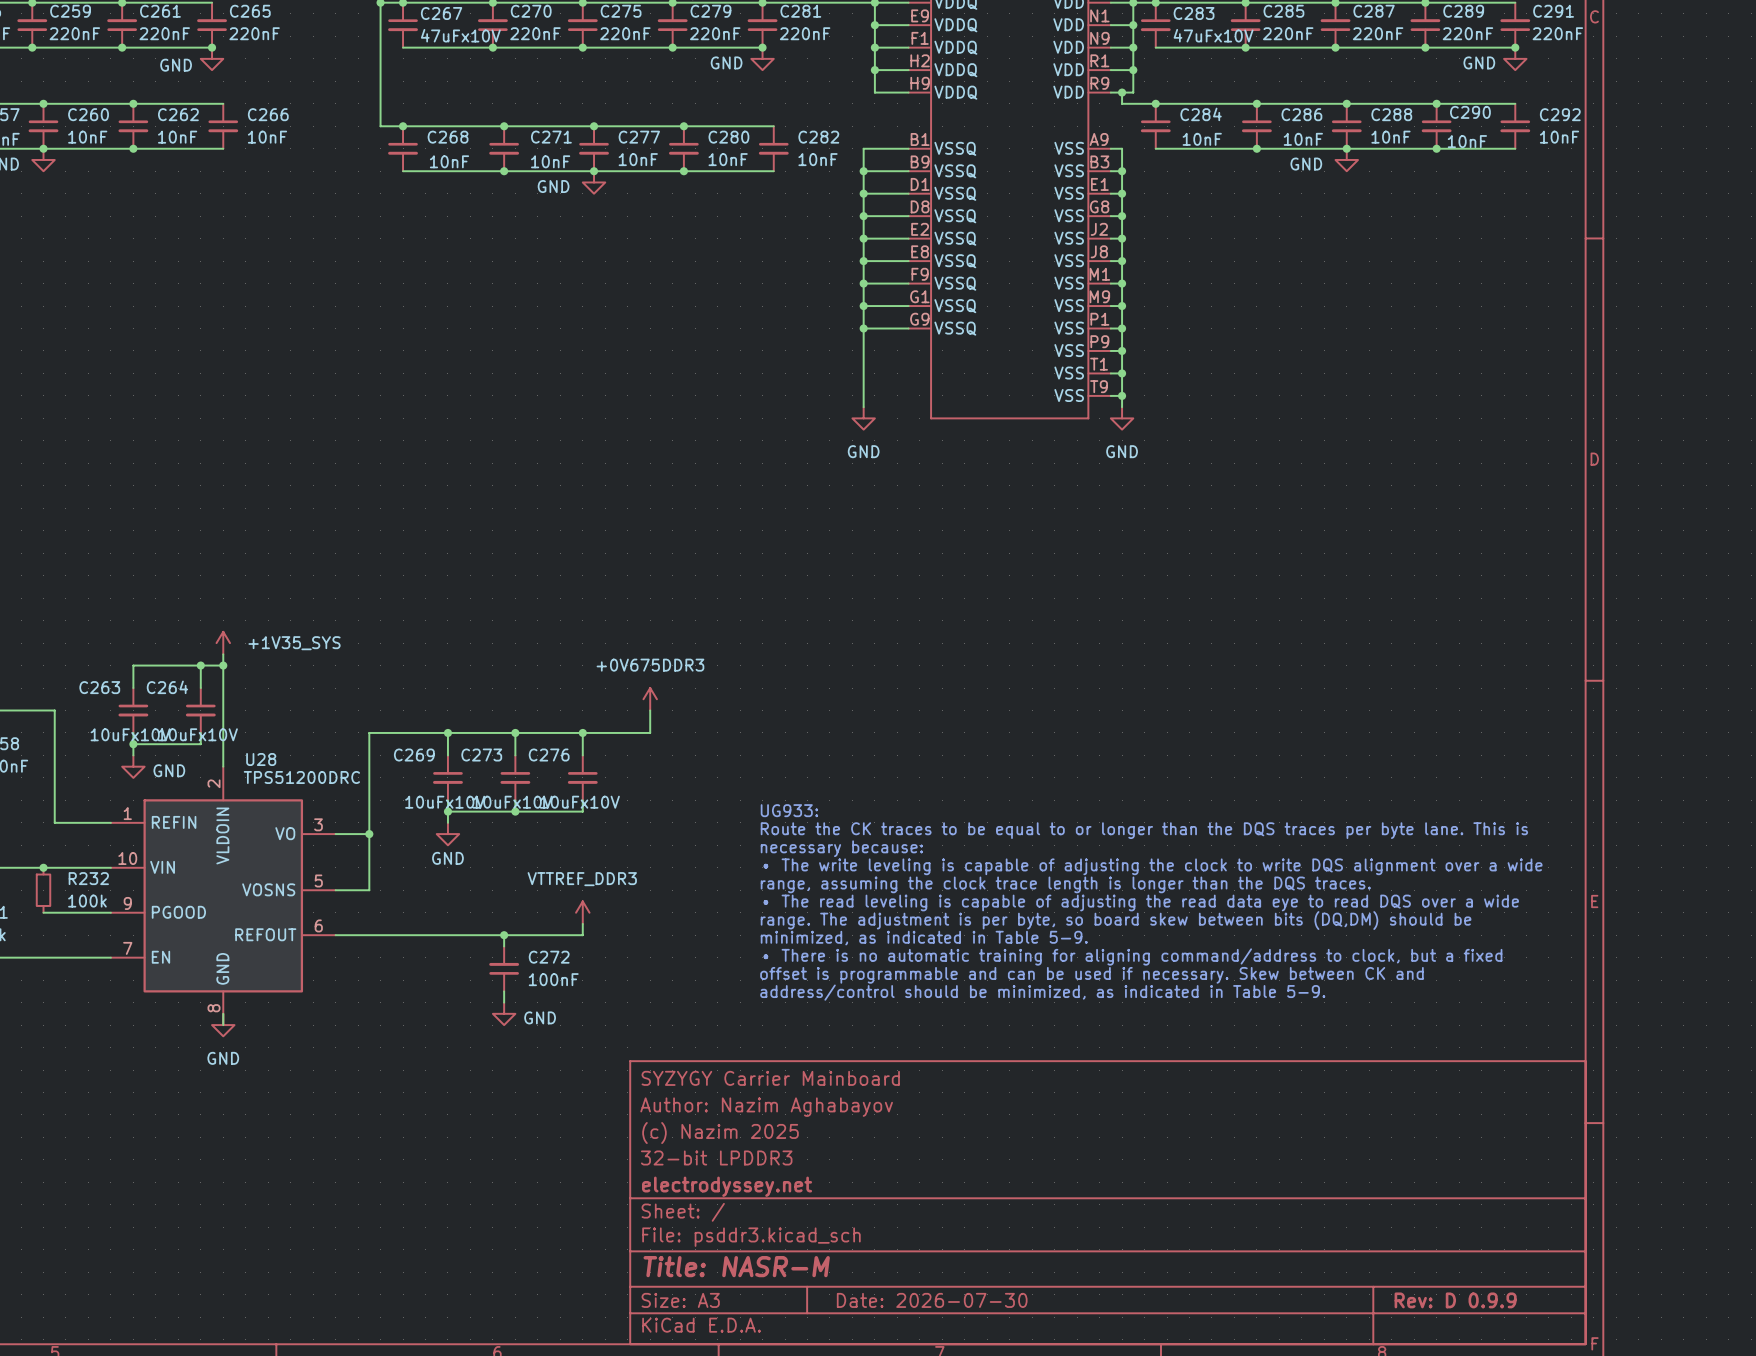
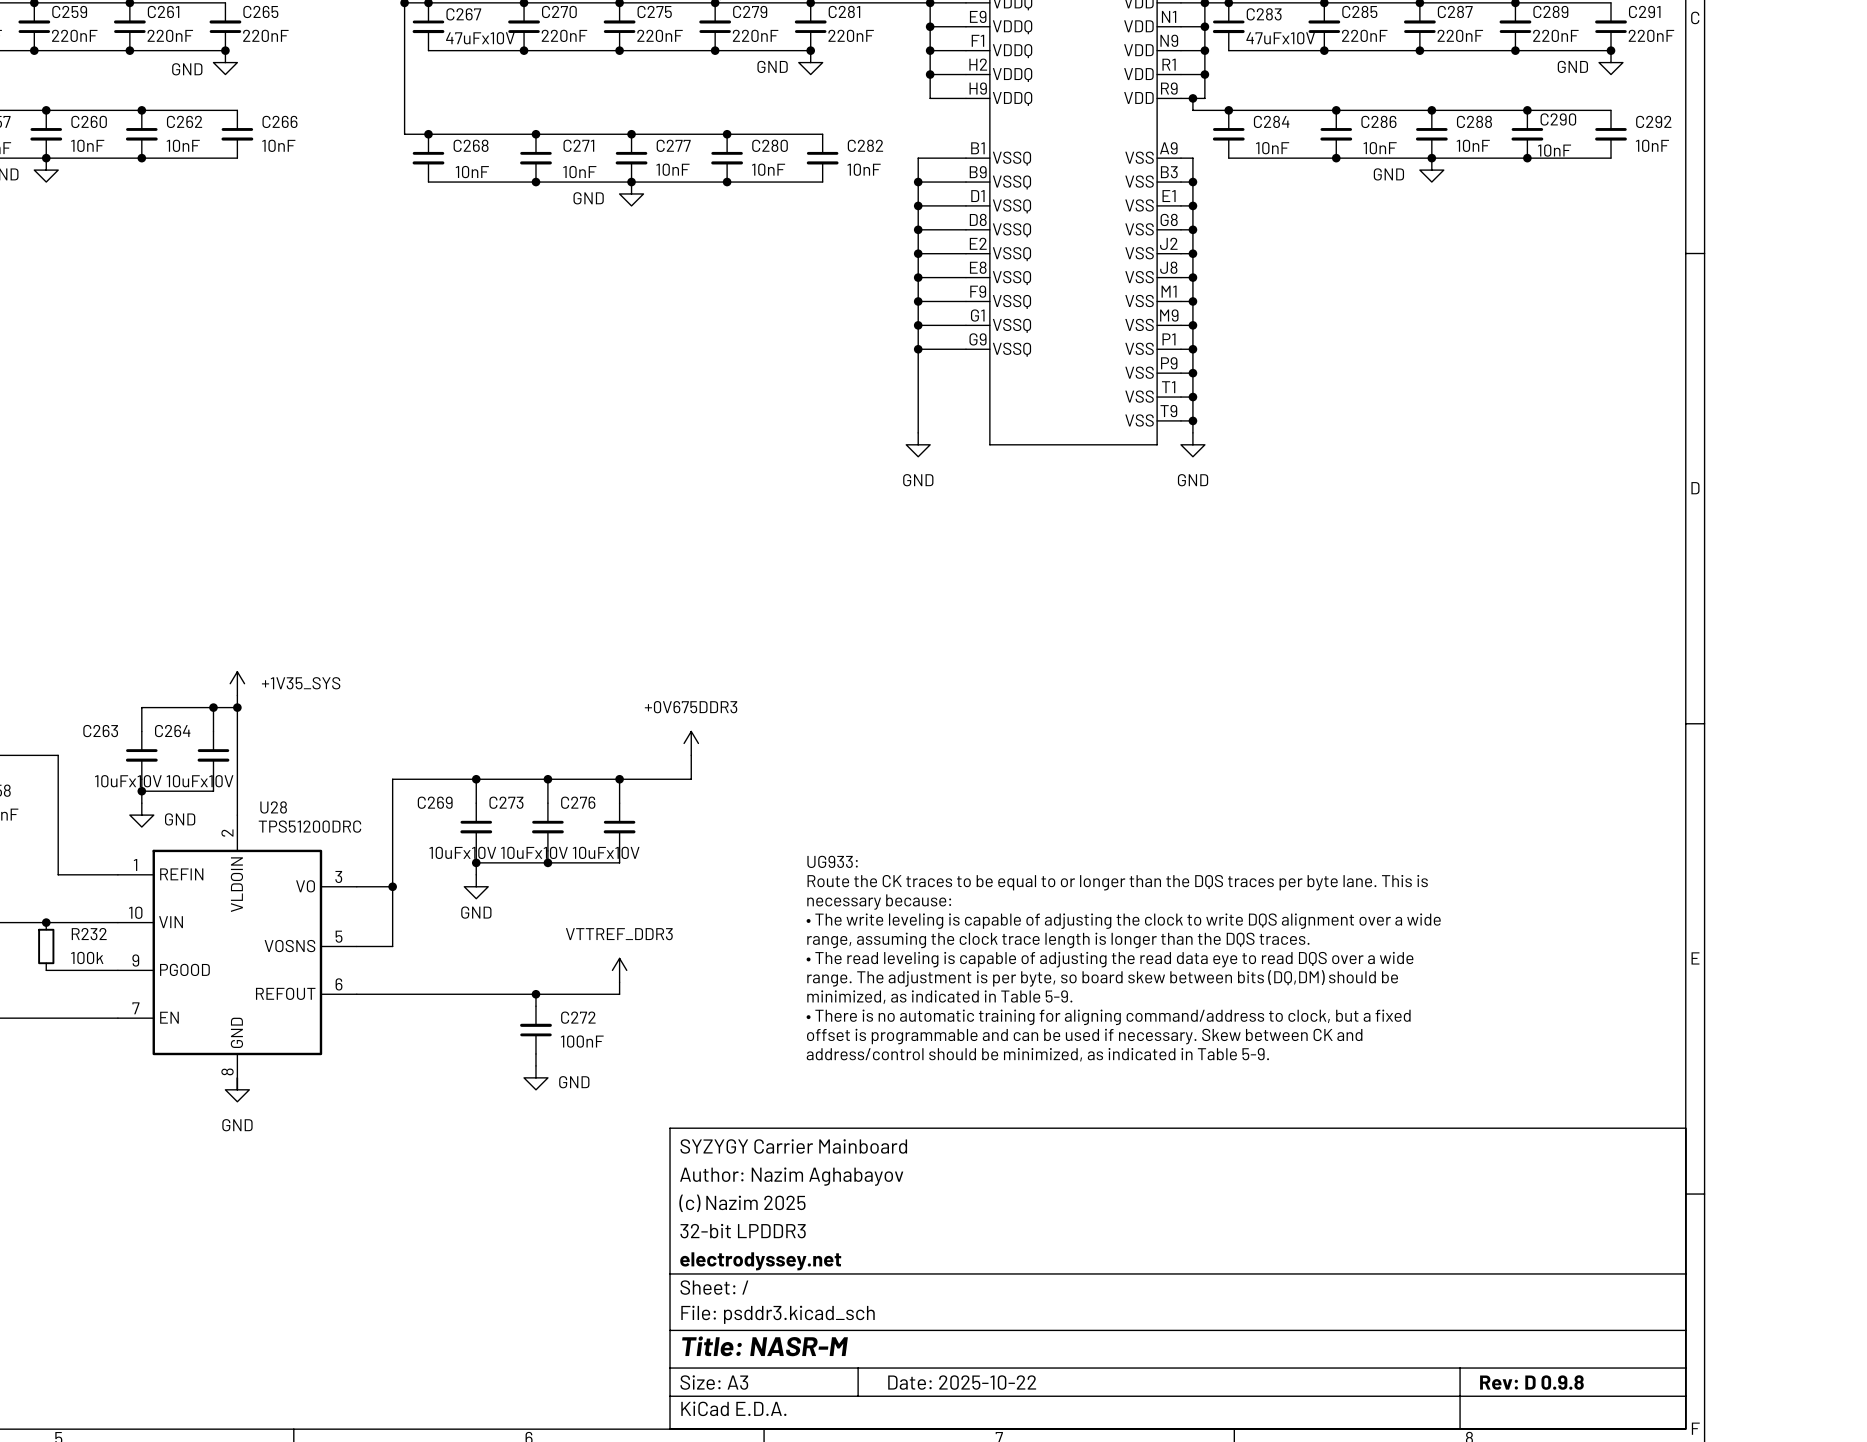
title block: Date: 2026-07-30 (932, 1300) -> Date: 2025-10-22 (962, 1382)
title block: Rev: D 0.9.9 (1455, 1300) -> Rev: D 0.9.8 (1531, 1382)

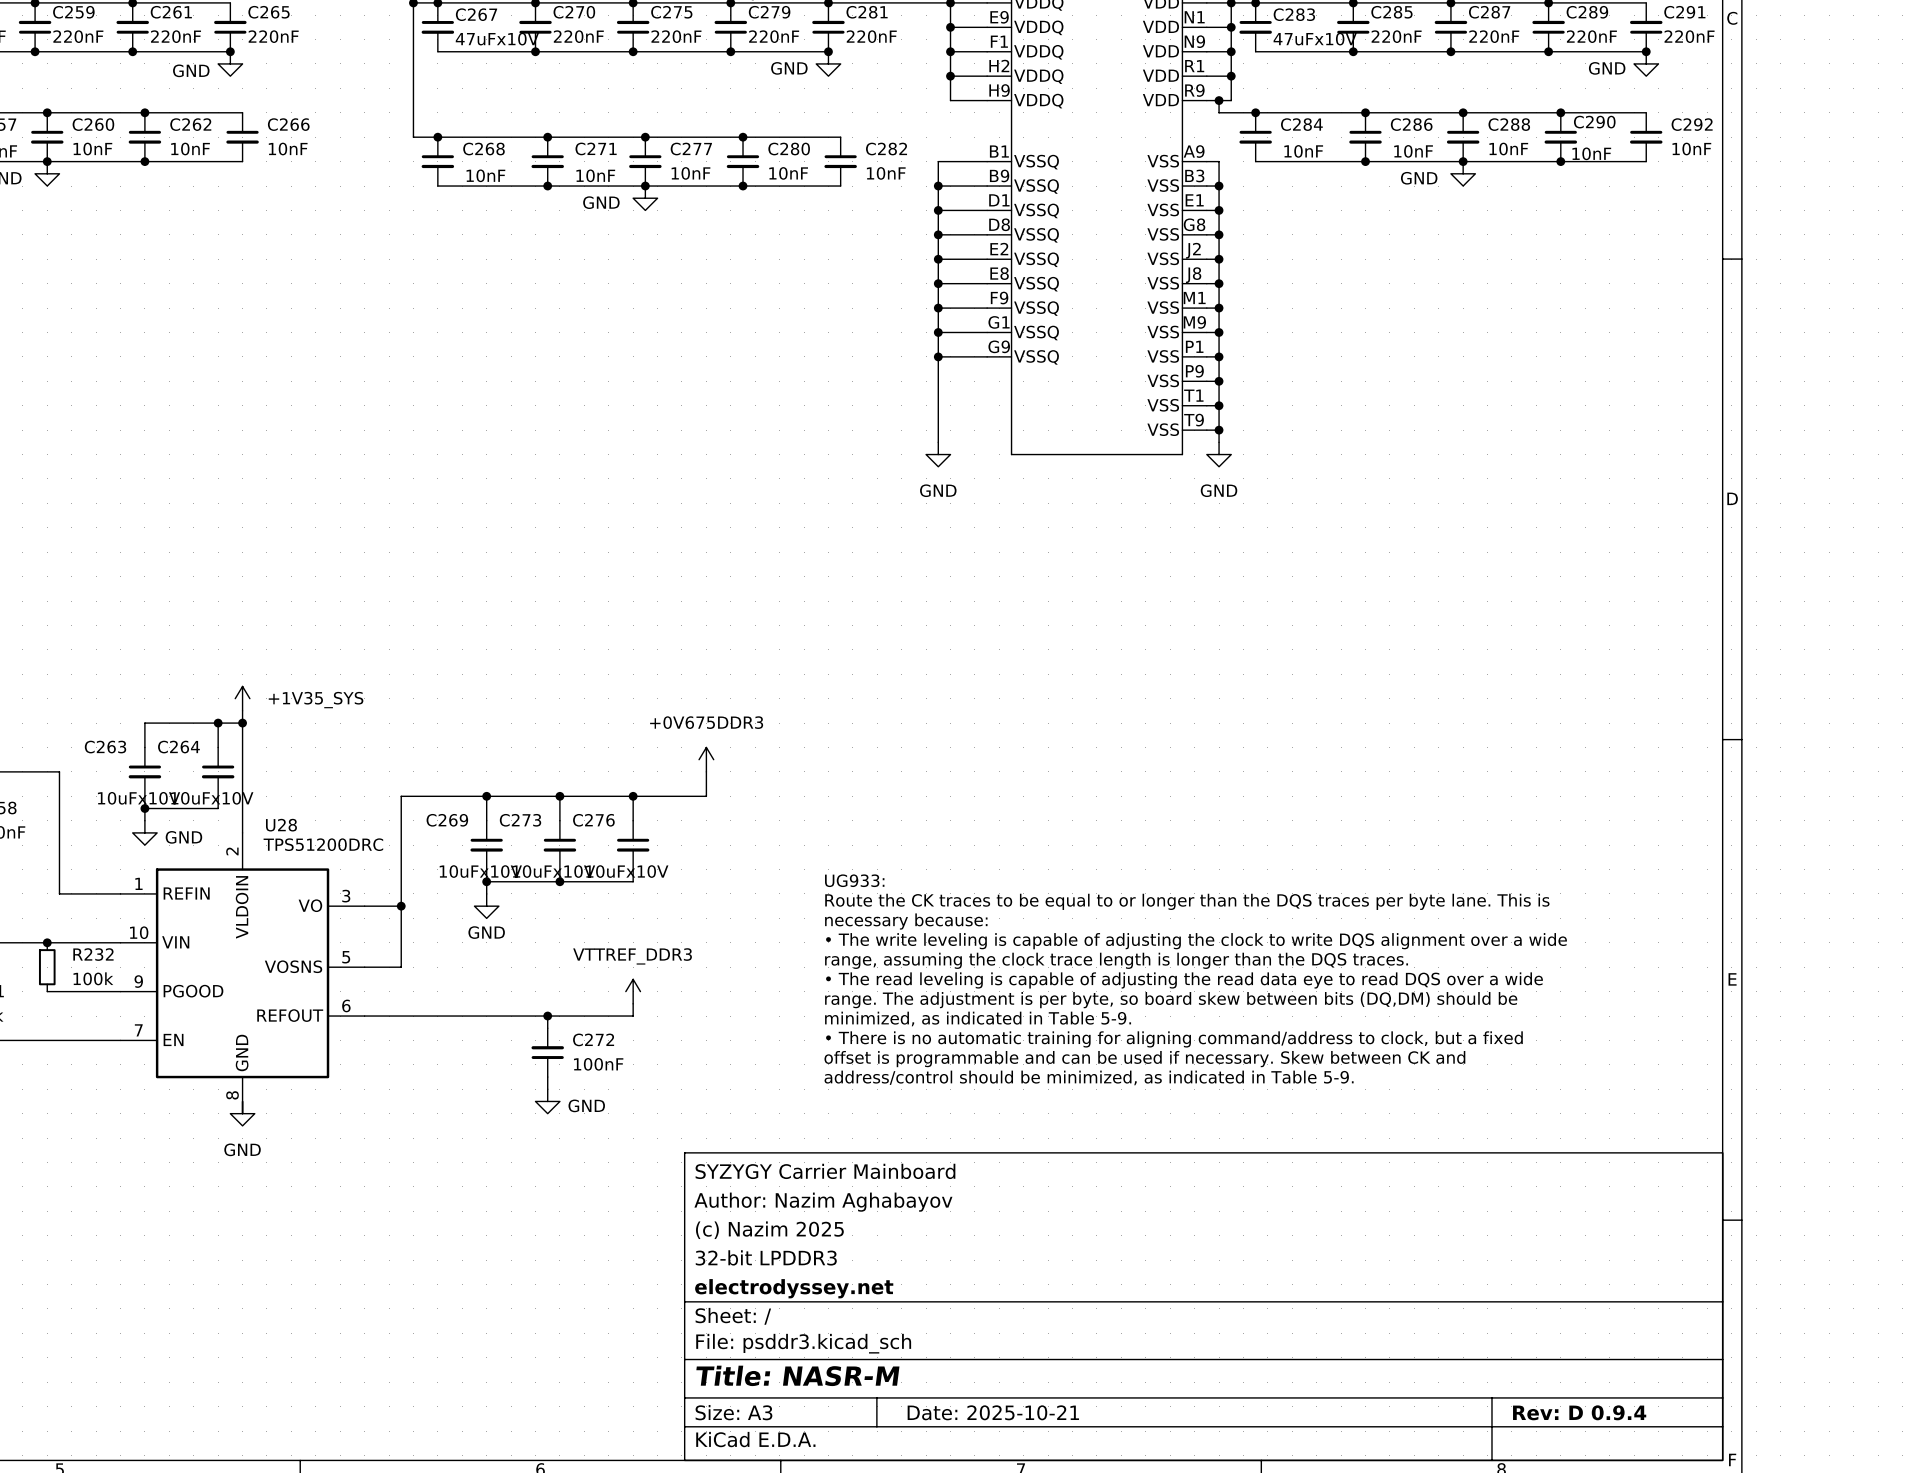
title block: Date: 2025-10-22 (962, 1382) -> Date: 2025-10-21 (993, 1412)
title block: Rev: D 0.9.8 (1531, 1382) -> Rev: D 0.9.4 (1579, 1412)

